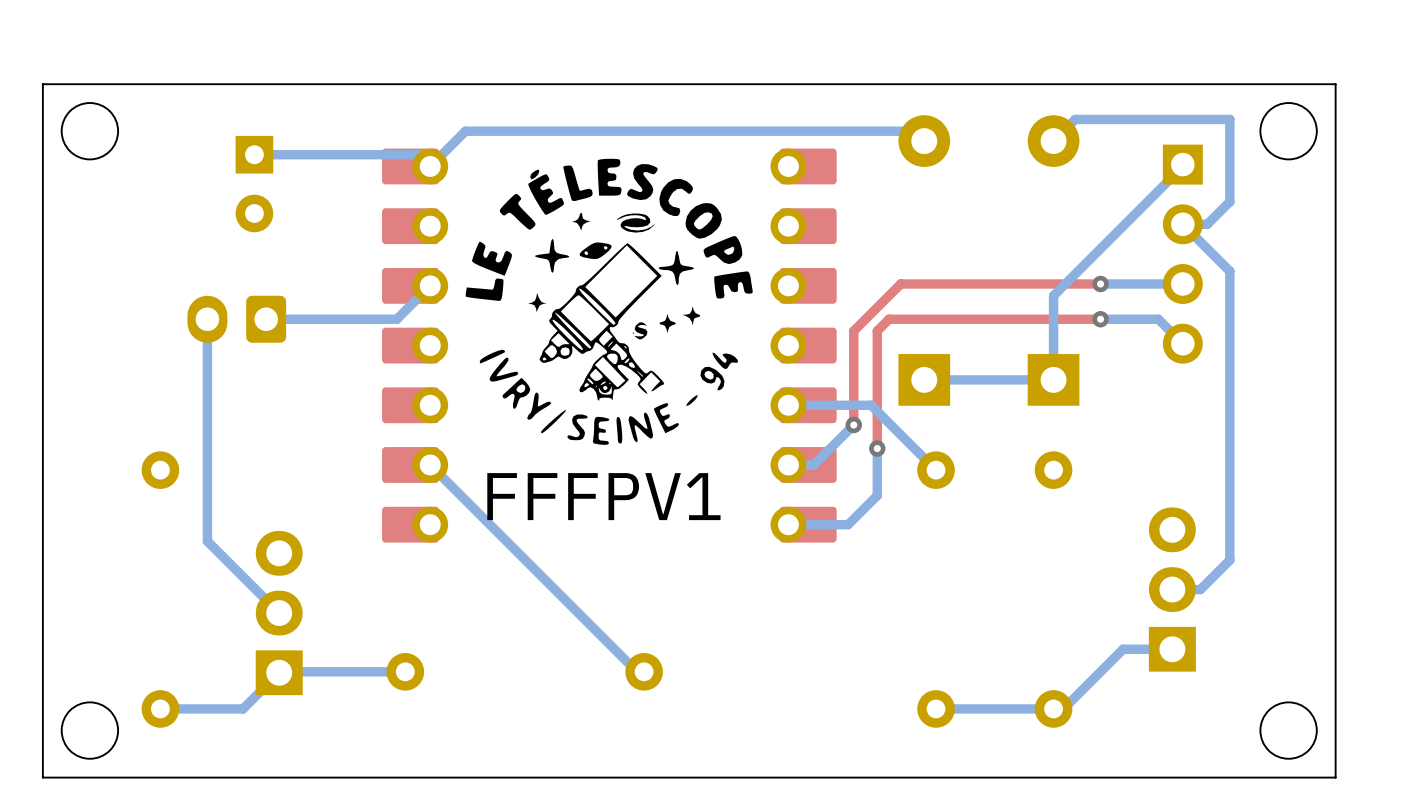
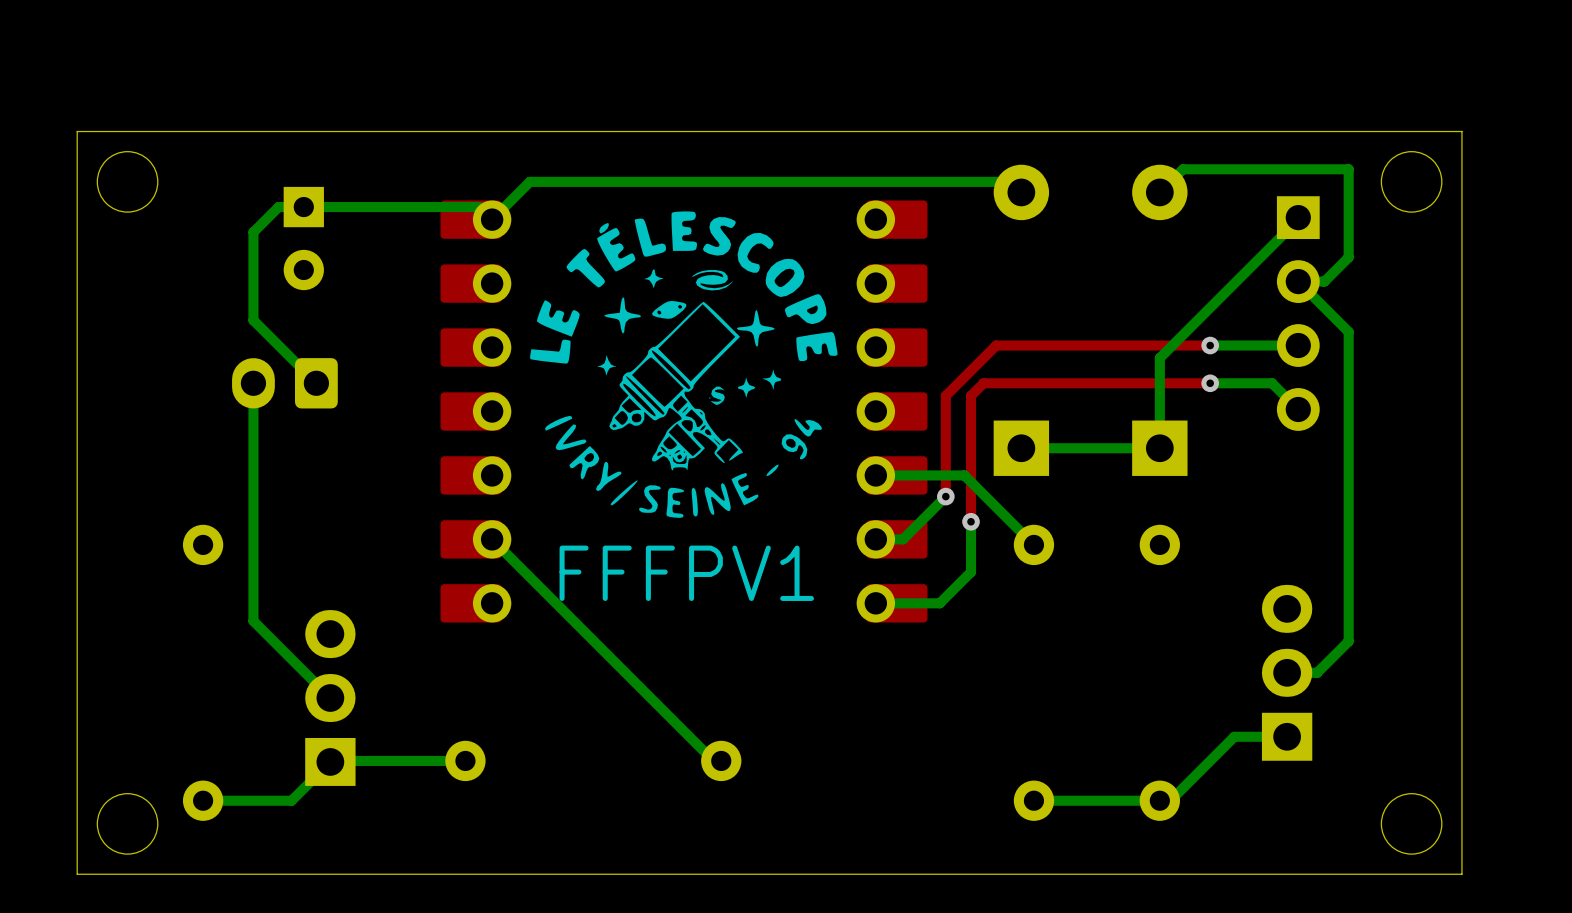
bottom track: (430, 285) (396, 319) (266, 319) -> (303, 207) (278, 207) (253, 232) (253, 320) (316, 383)

